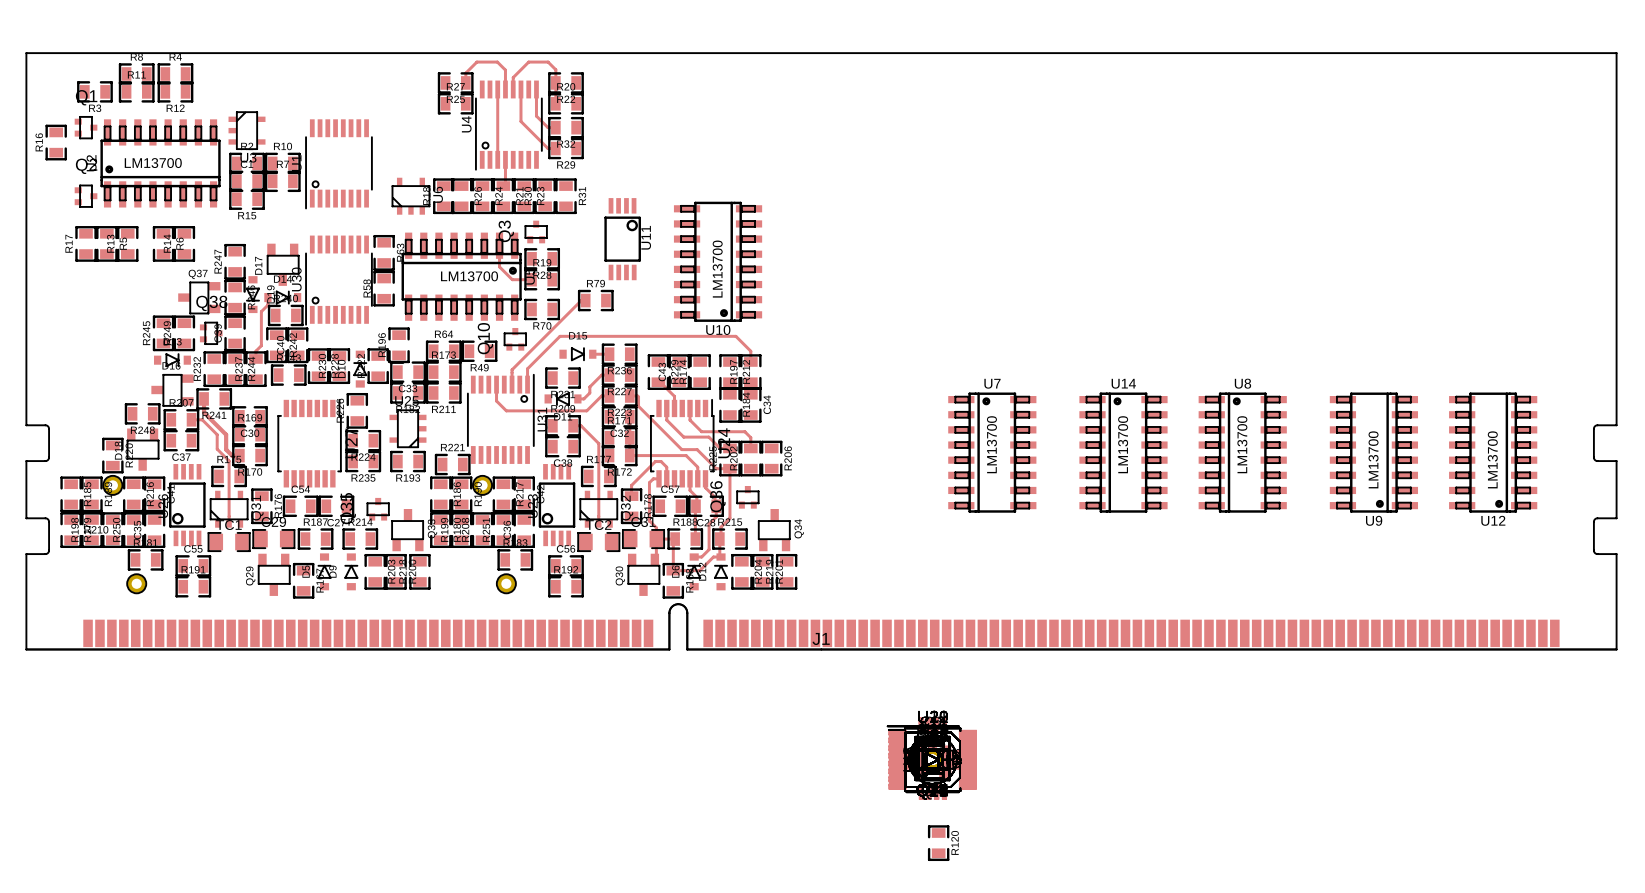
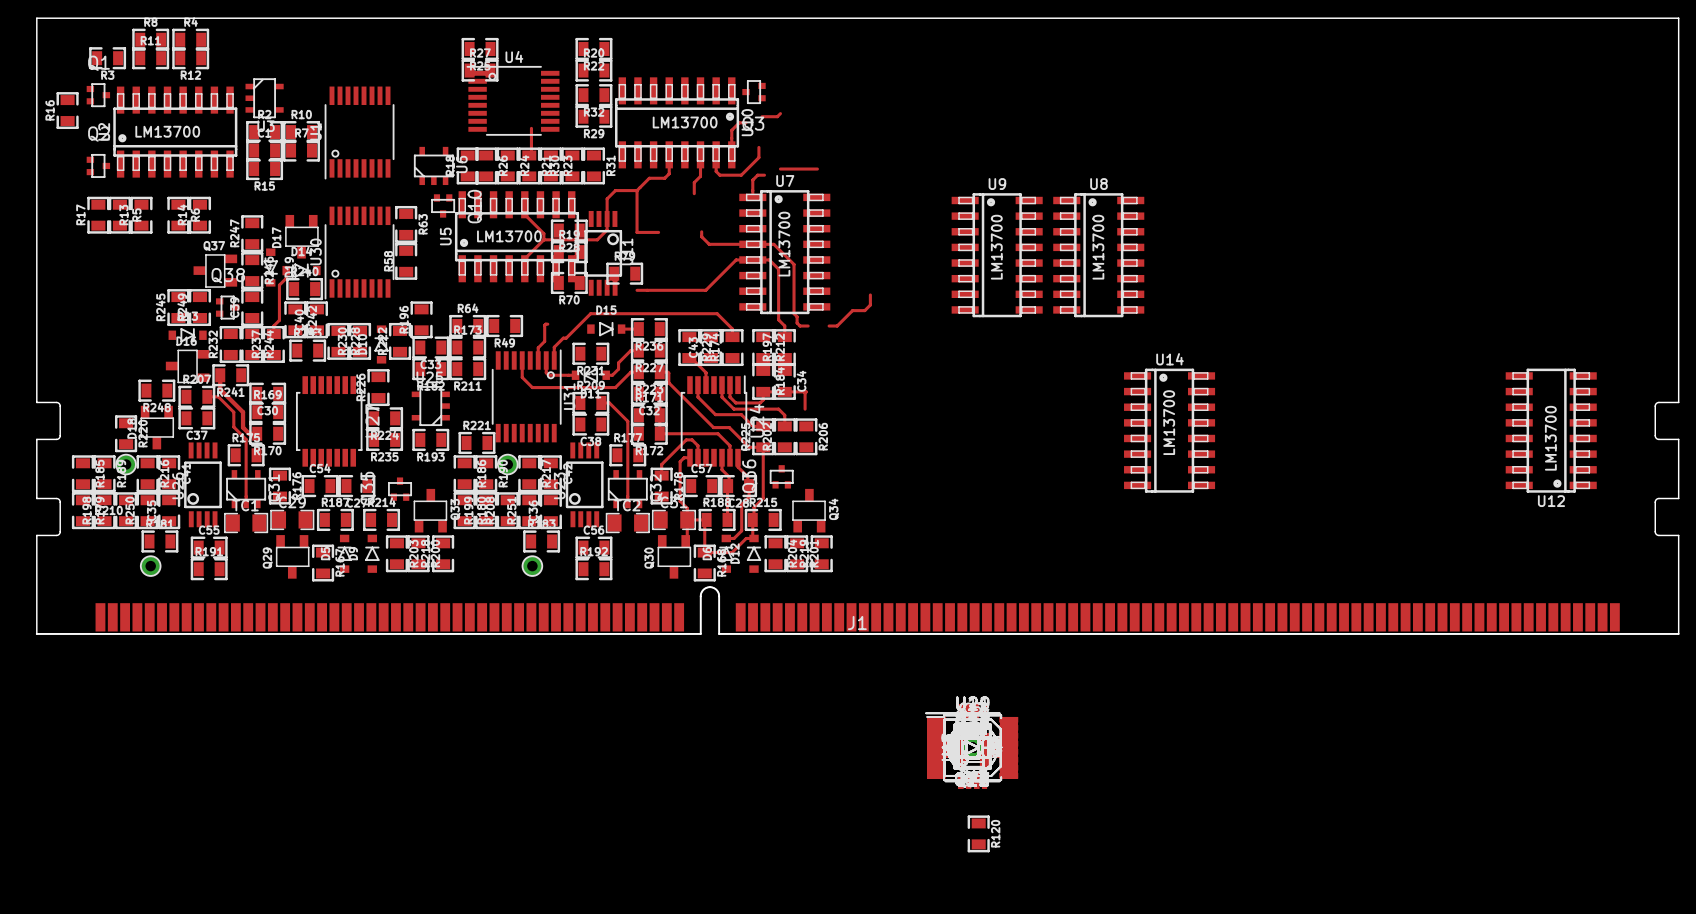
track: (465, 82) (465, 73) (476, 62) (497, 62) (505, 70) (505, 89) -> none
track: (497, 89) (497, 159) -> none
track: (513, 89) (513, 77) (528, 62) (548, 62) (555, 69) (555, 103) -> none
track: (520, 89) (520, 121) (548, 148) (555, 148) -> none
track: (536, 89) (536, 116) (548, 127) (555, 127) -> none
U4 rotation: 0° (508, 125) -> 90° clockwise (512, 100)
track: none -> (780, 113) (777, 116) (762, 116)
track: none -> (746, 122) (739, 122) (731, 130) (731, 154)
track: none -> (758, 147) (758, 157) (741, 175) (719, 175) (716, 171) (716, 154)
track: none -> (669, 154) (669, 173) (664, 178) (649, 178) (637, 190)
track: none -> (700, 154) (700, 176) (694, 182) (694, 193)
track: none -> (780, 169) (817, 169)
track: none -> (764, 175) (757, 175) (752, 180) (752, 197)
track: none -> (637, 190) (615, 190) (607, 198) (607, 230) (597, 239) (543, 239)
track: none -> (637, 190) (637, 232) (658, 232)
Q3 rotation: 0° (536, 231) -> 90° counterclockwise (754, 92)
Q3 position: (536, 231) -> (754, 92)
track: none -> (524, 204) (524, 214) (543, 233) (543, 239)
U11 position: (622, 239) -> (603, 253)
track: (499, 245) (499, 266) (512, 279) (532, 279) -> none
track: none -> (701, 231) (701, 236) (709, 244) (773, 244) (794, 264) (794, 313) (800, 326) (808, 326)
U10 rotation: 0° (718, 261) -> 90° counterclockwise (677, 122)
U10 position: (718, 261) -> (677, 122)
track: none -> (543, 239) (524, 258) (524, 268)
U5 rotation: 0° (461, 276) -> 180° (516, 236)
track: (585, 300) (581, 300) (512, 369) (512, 372) -> (547, 324) (544, 325) (544, 341) (538, 347)
track: none -> (637, 290) (705, 290) (736, 259) (769, 259) (778, 269) (778, 319)
track: none -> (870, 294) (870, 305) (864, 310) (852, 310) (837, 326) (829, 326)
Q10 rotation: 0° (515, 339) -> 180° (443, 205)
Q10 position: (515, 339) -> (443, 205)
track: (744, 345) (735, 336) (560, 336) (527, 368) (527, 371) -> (732, 337) (732, 329) (717, 313) (590, 313) (554, 347)
track: none -> (546, 360) (546, 372) (548, 375) (575, 375)
track: none -> (729, 385) (729, 397) (735, 402) (760, 402) (763, 399) (763, 391) (806, 391) (805, 409)
U7 position: (992, 452) -> (784, 252)
U8 position: (1242, 452) -> (1098, 255)
U9 rotation: 0° (1373, 452) -> 180° (997, 255)
U9 position: (1373, 452) -> (997, 255)

